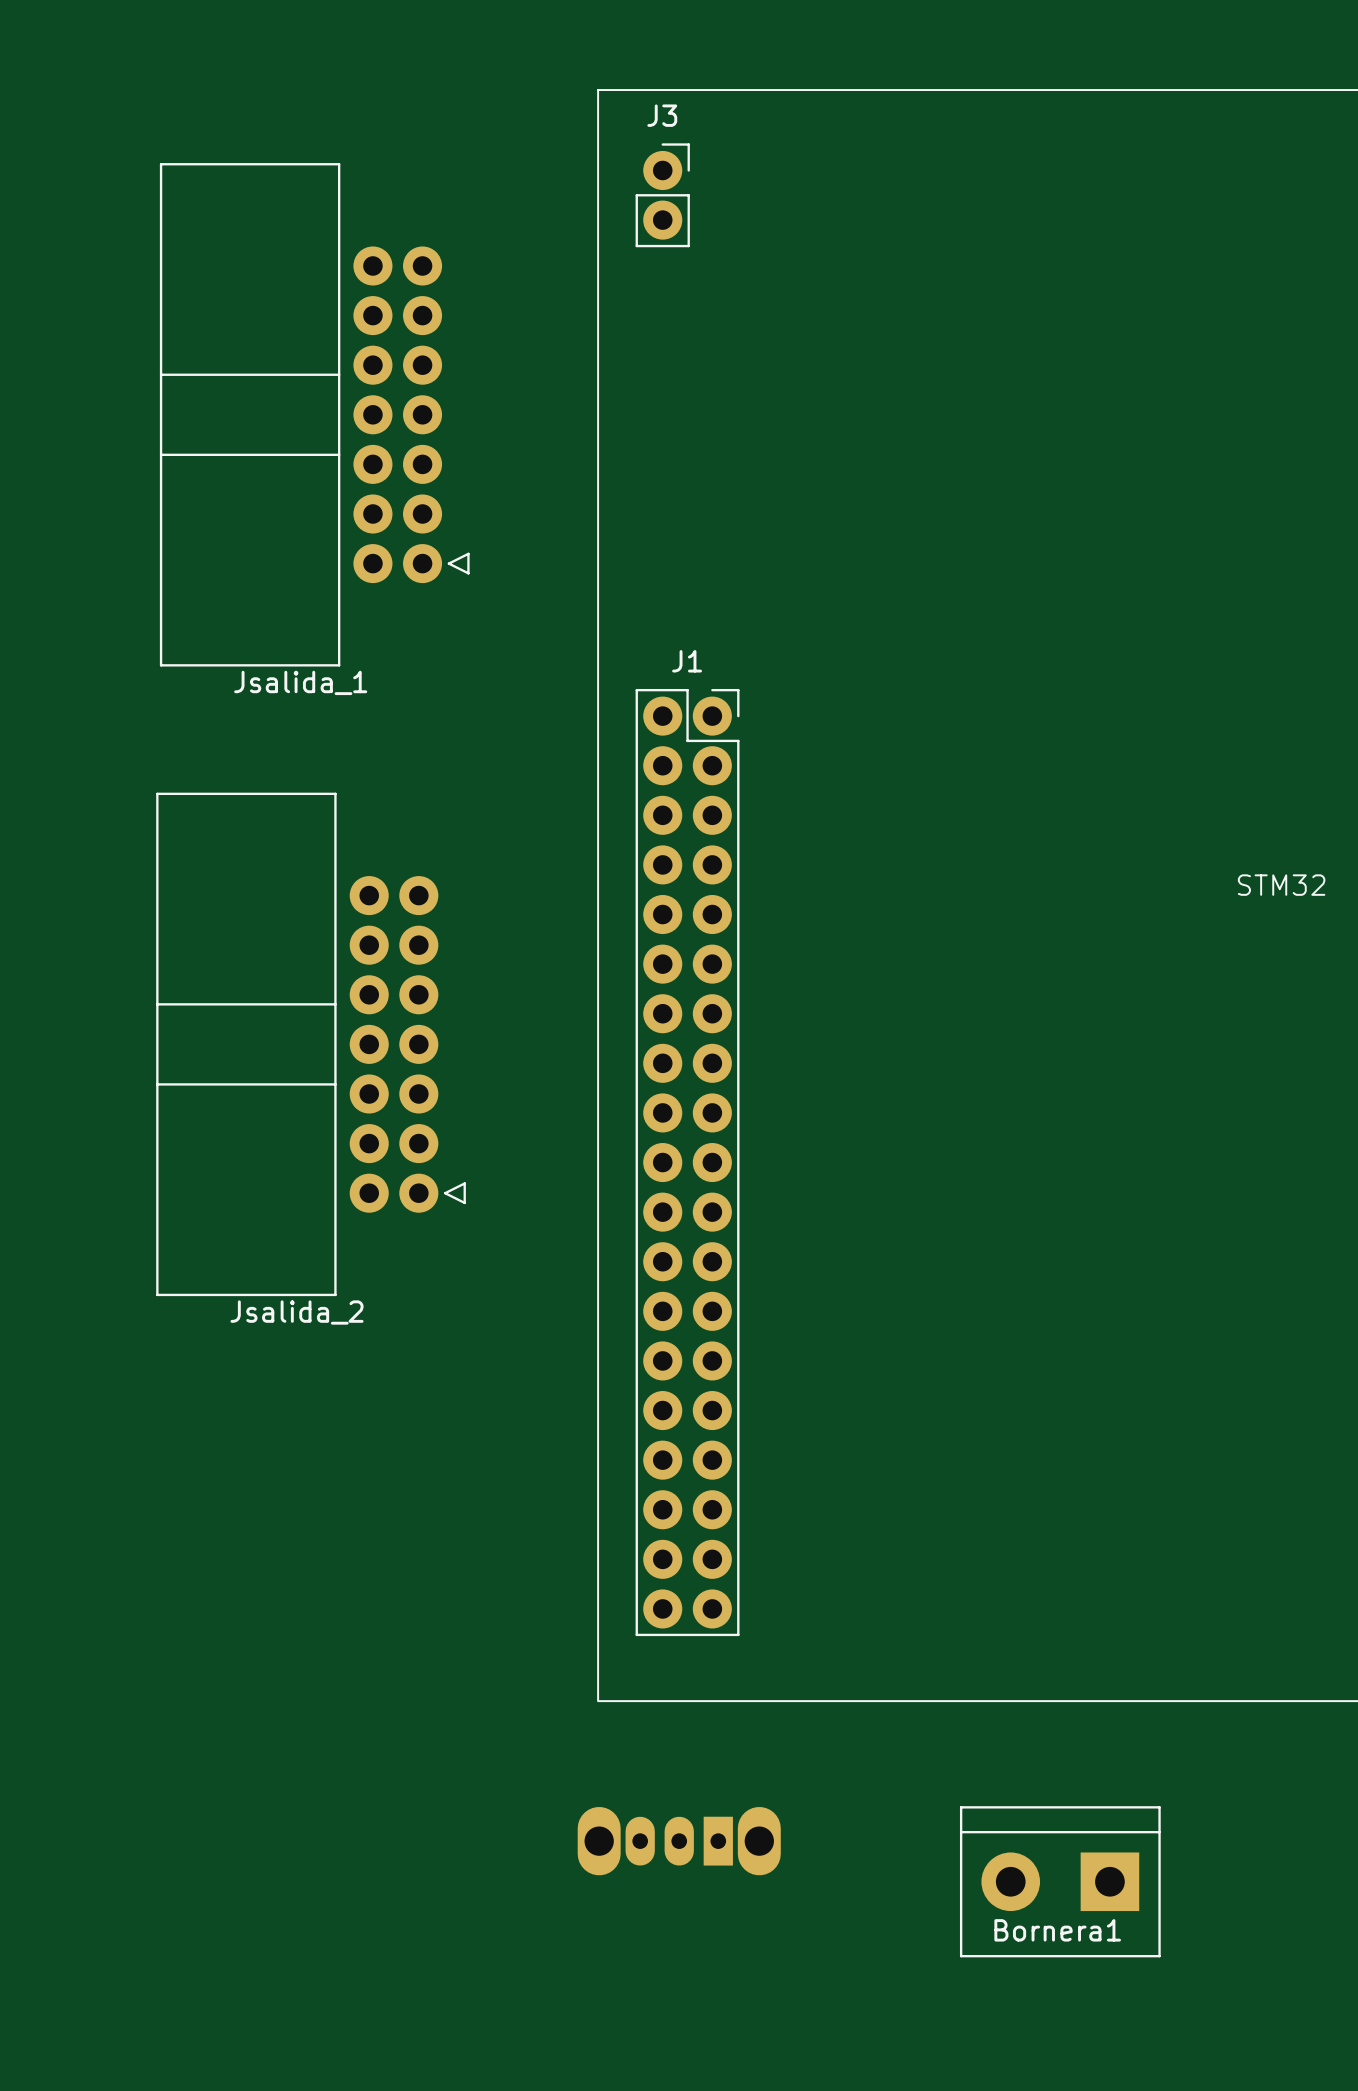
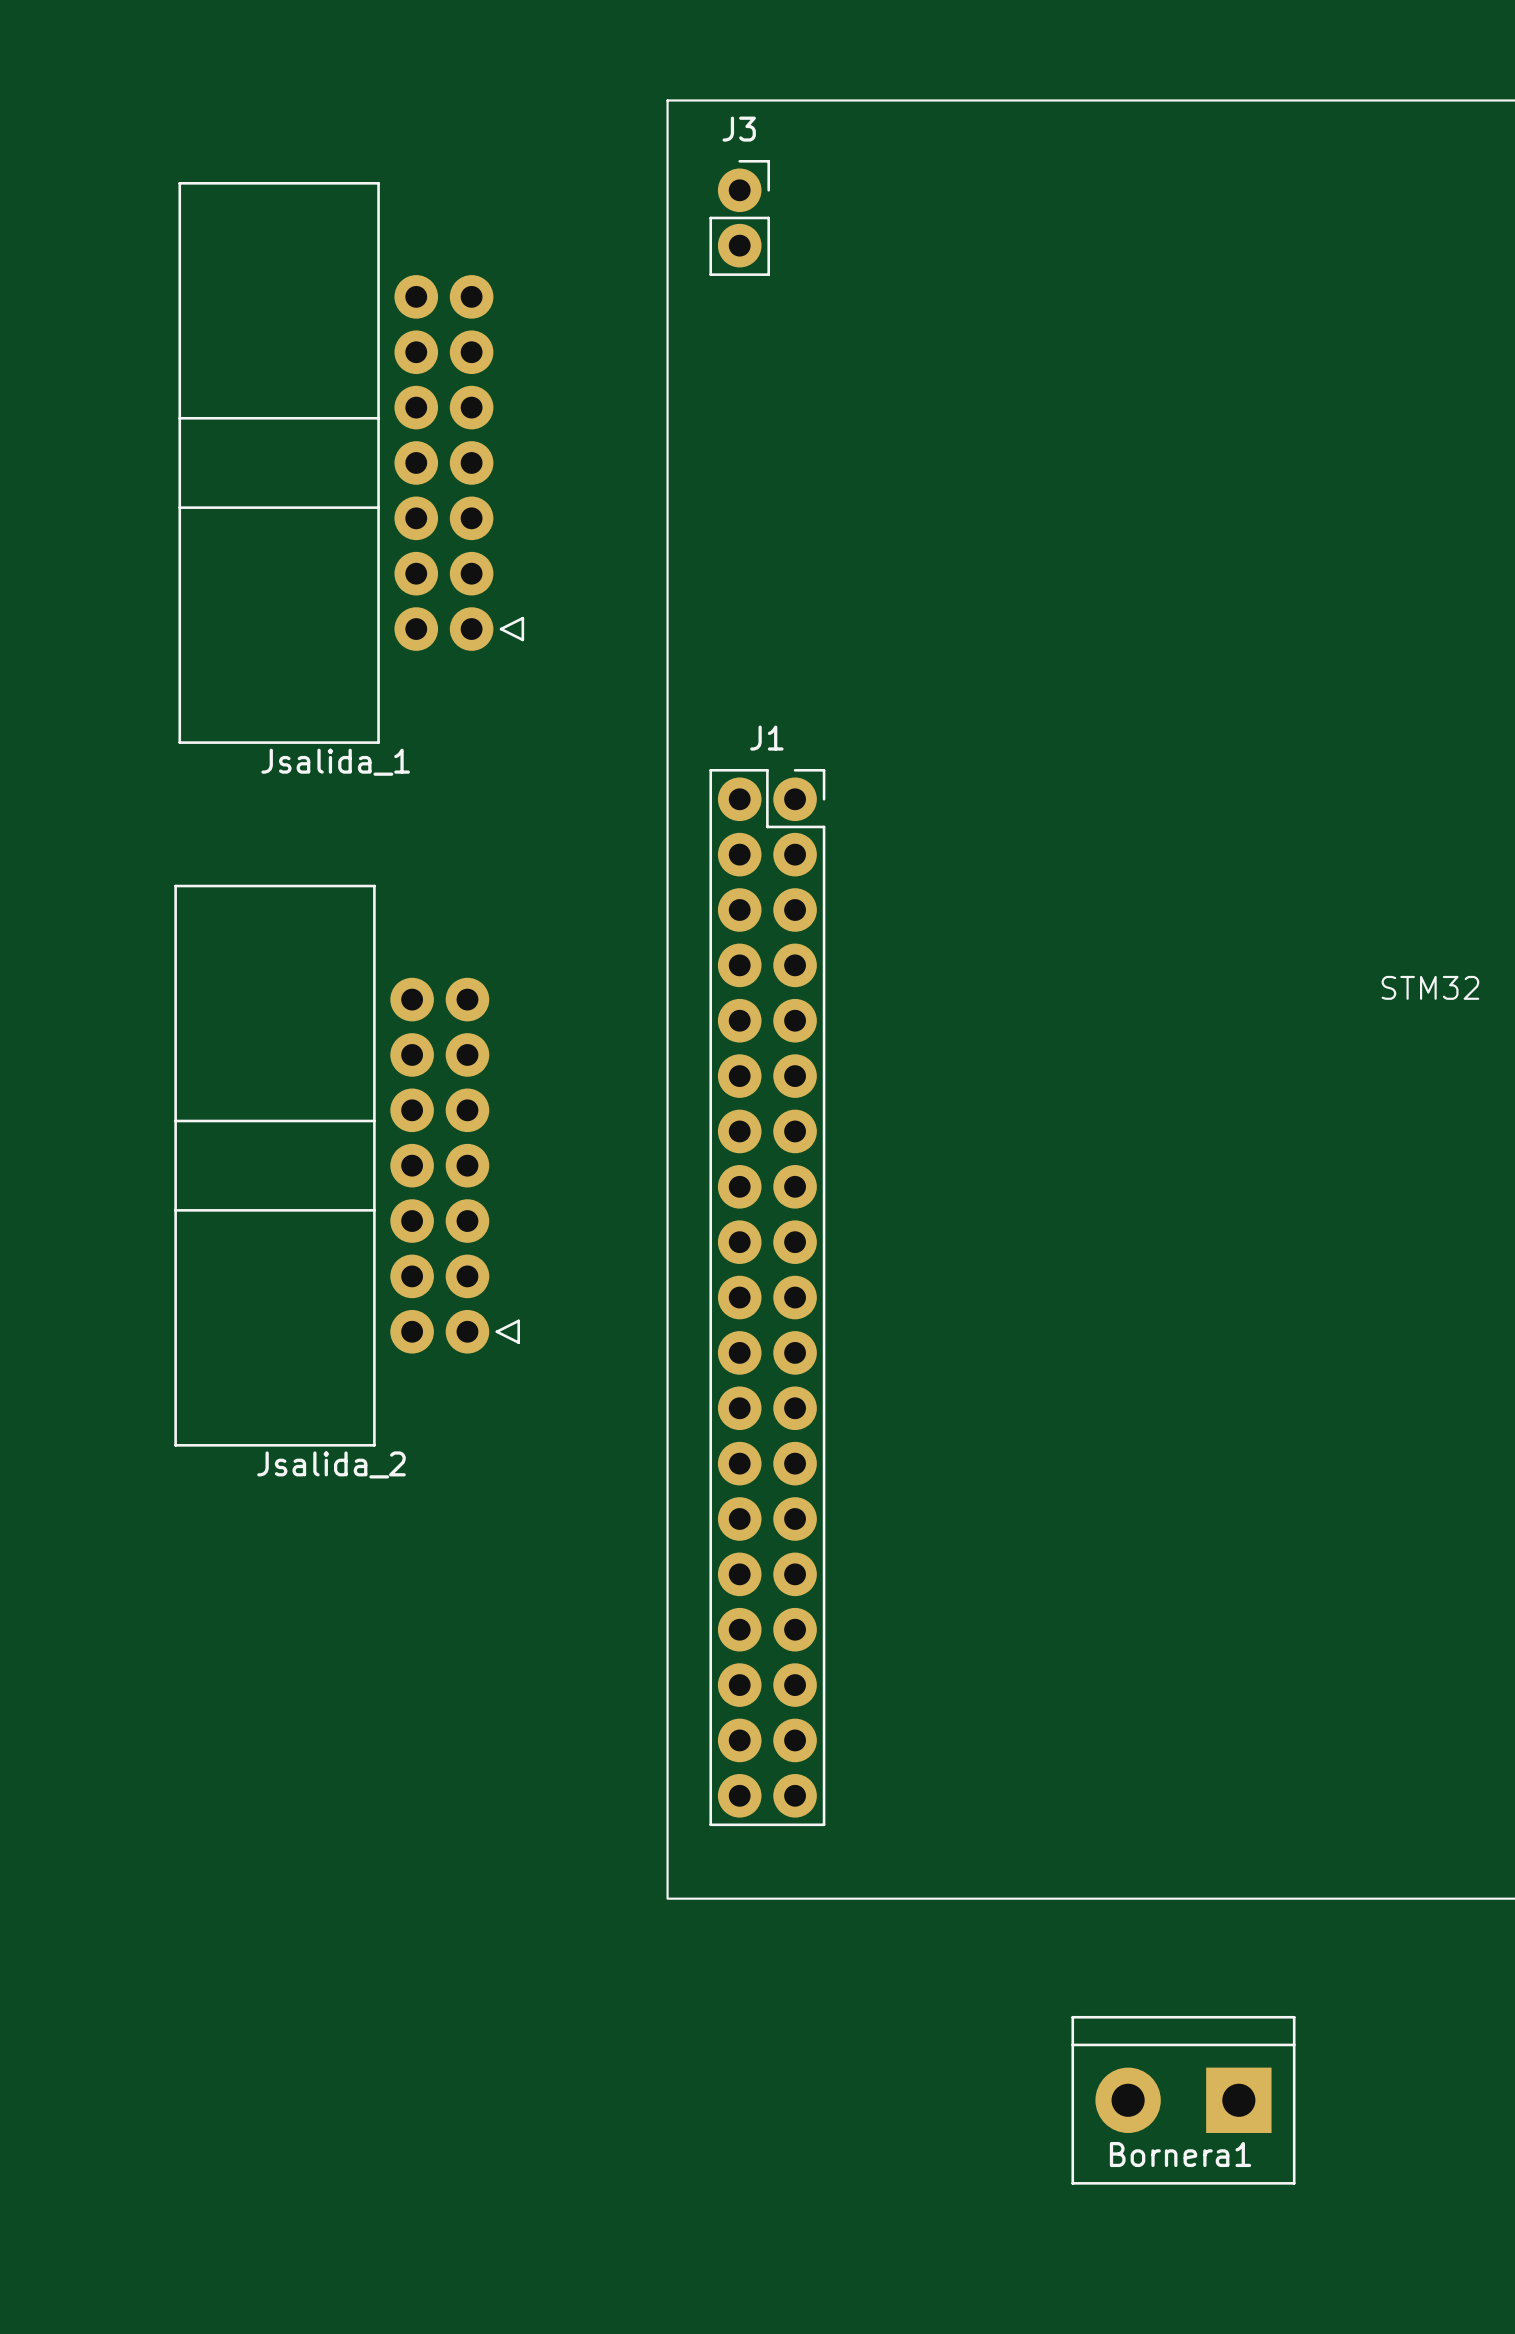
part: (679, 1841) -> none

